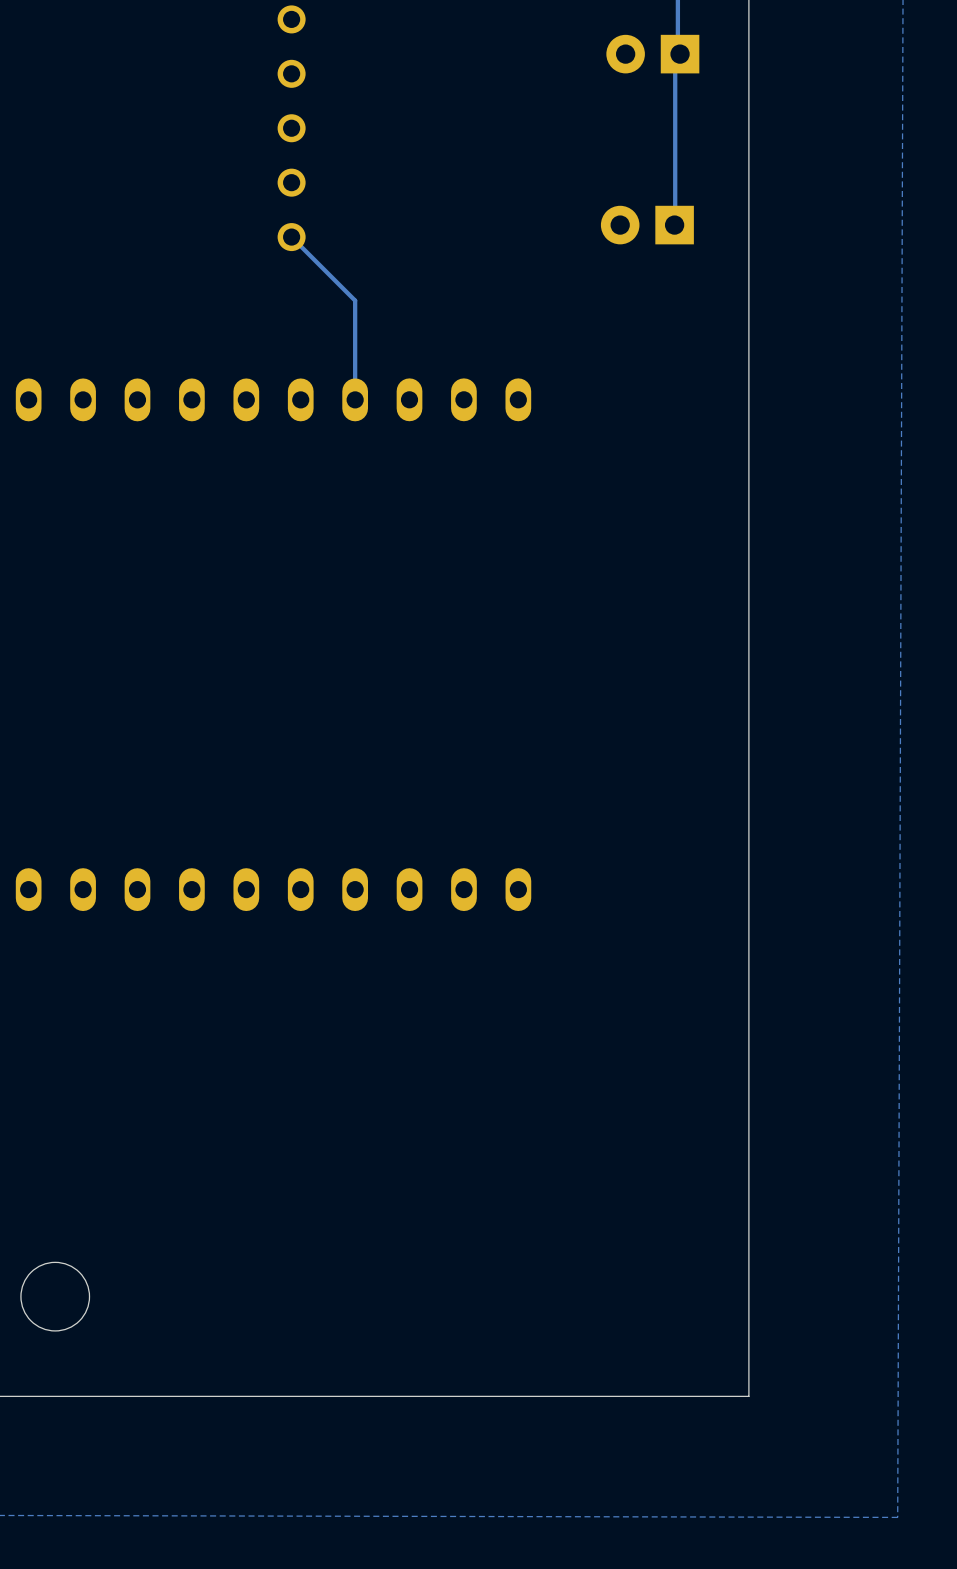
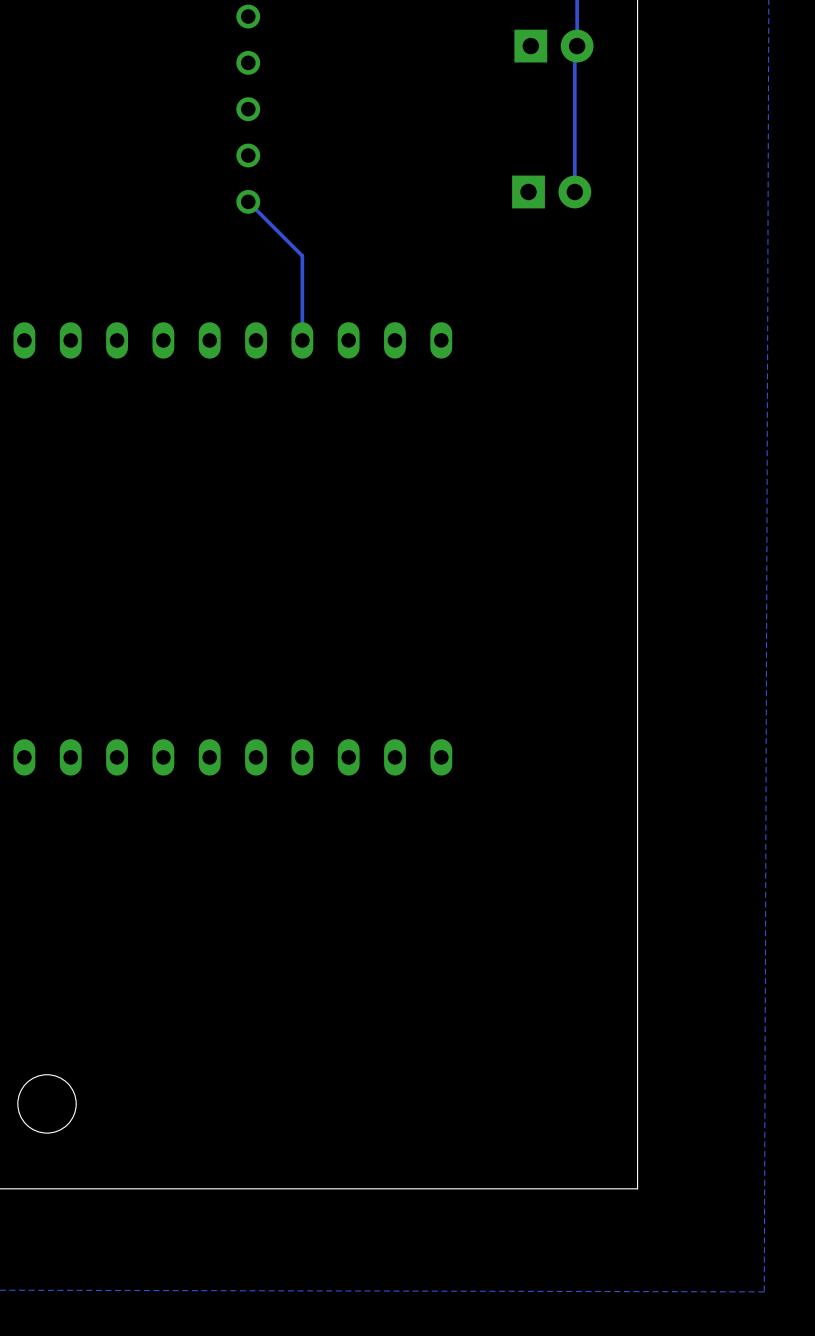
part rotation: 0° (652, 54) -> 180° (553, 46)
part rotation: 0° (647, 225) -> 180° (551, 191)

